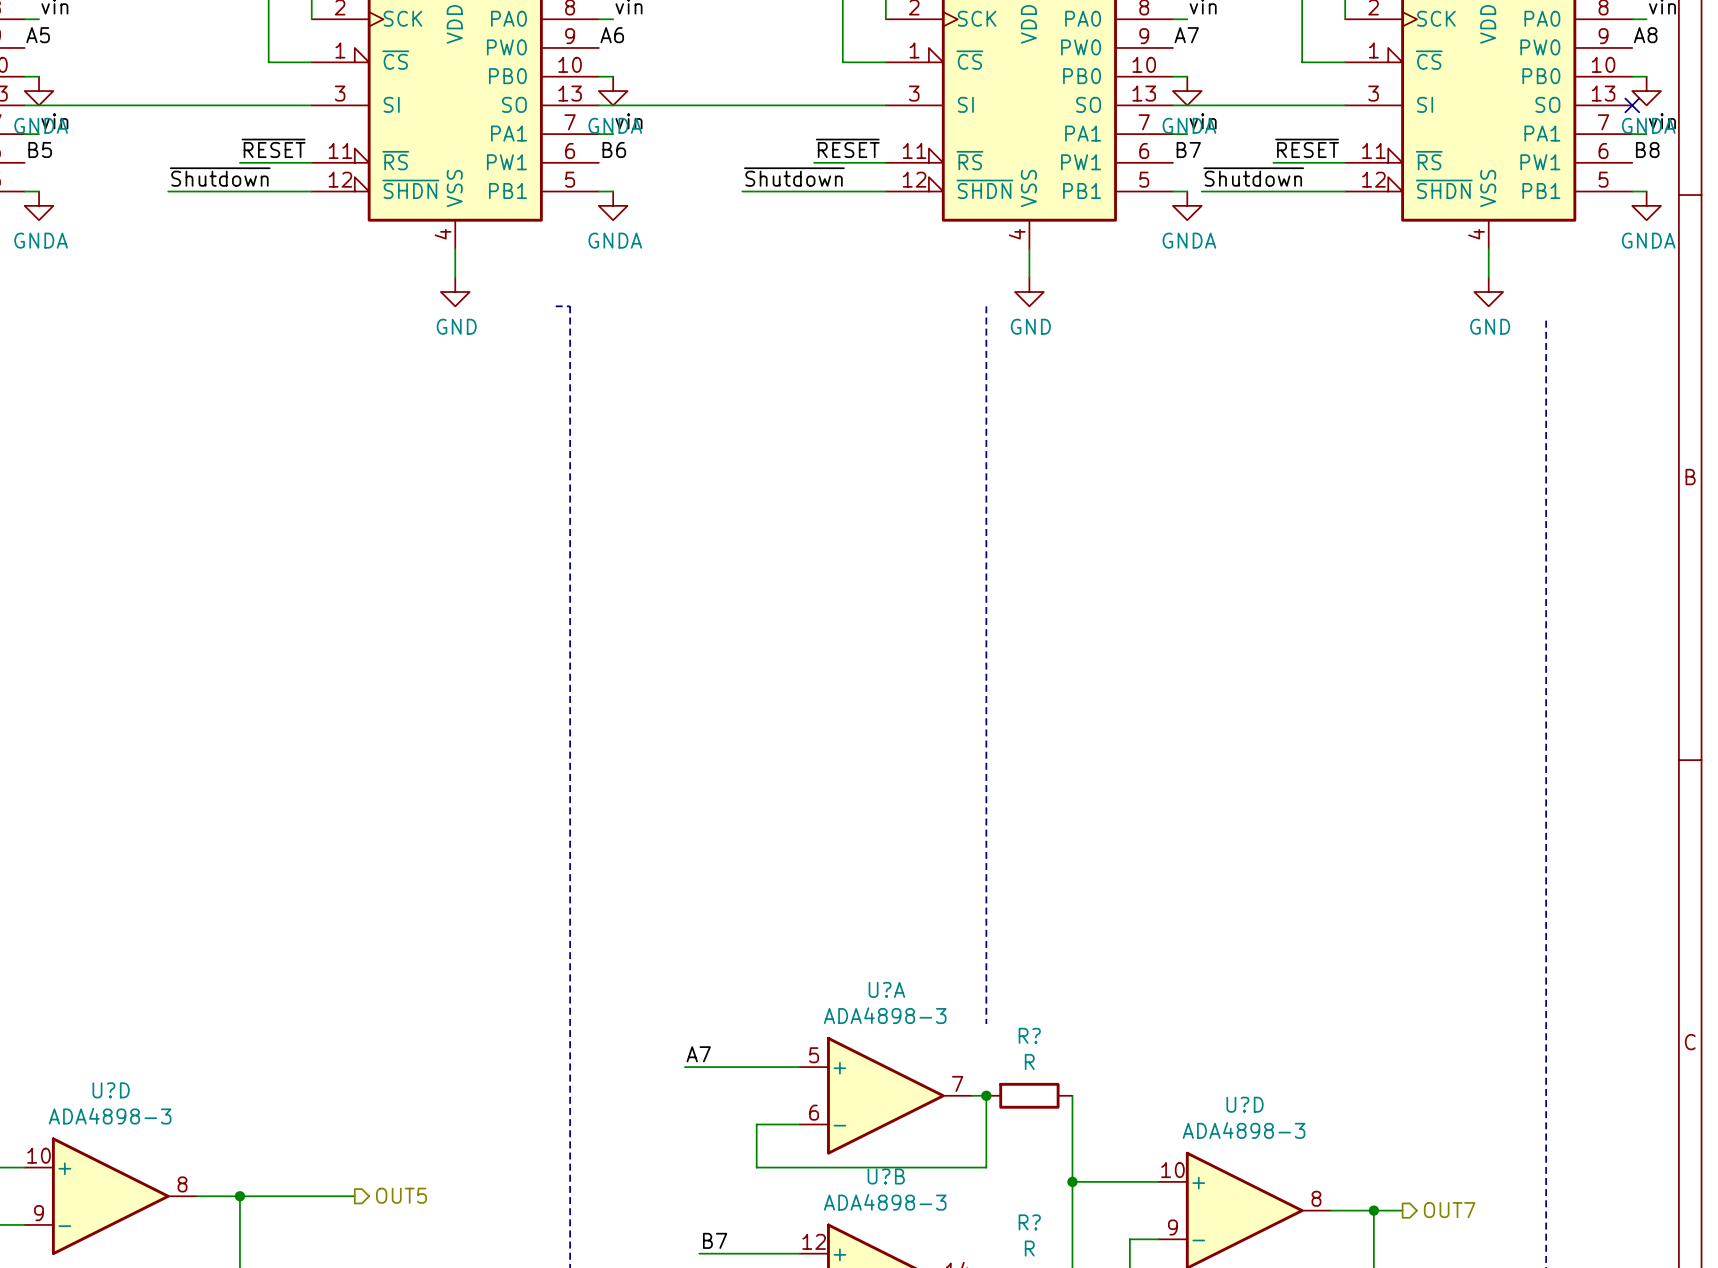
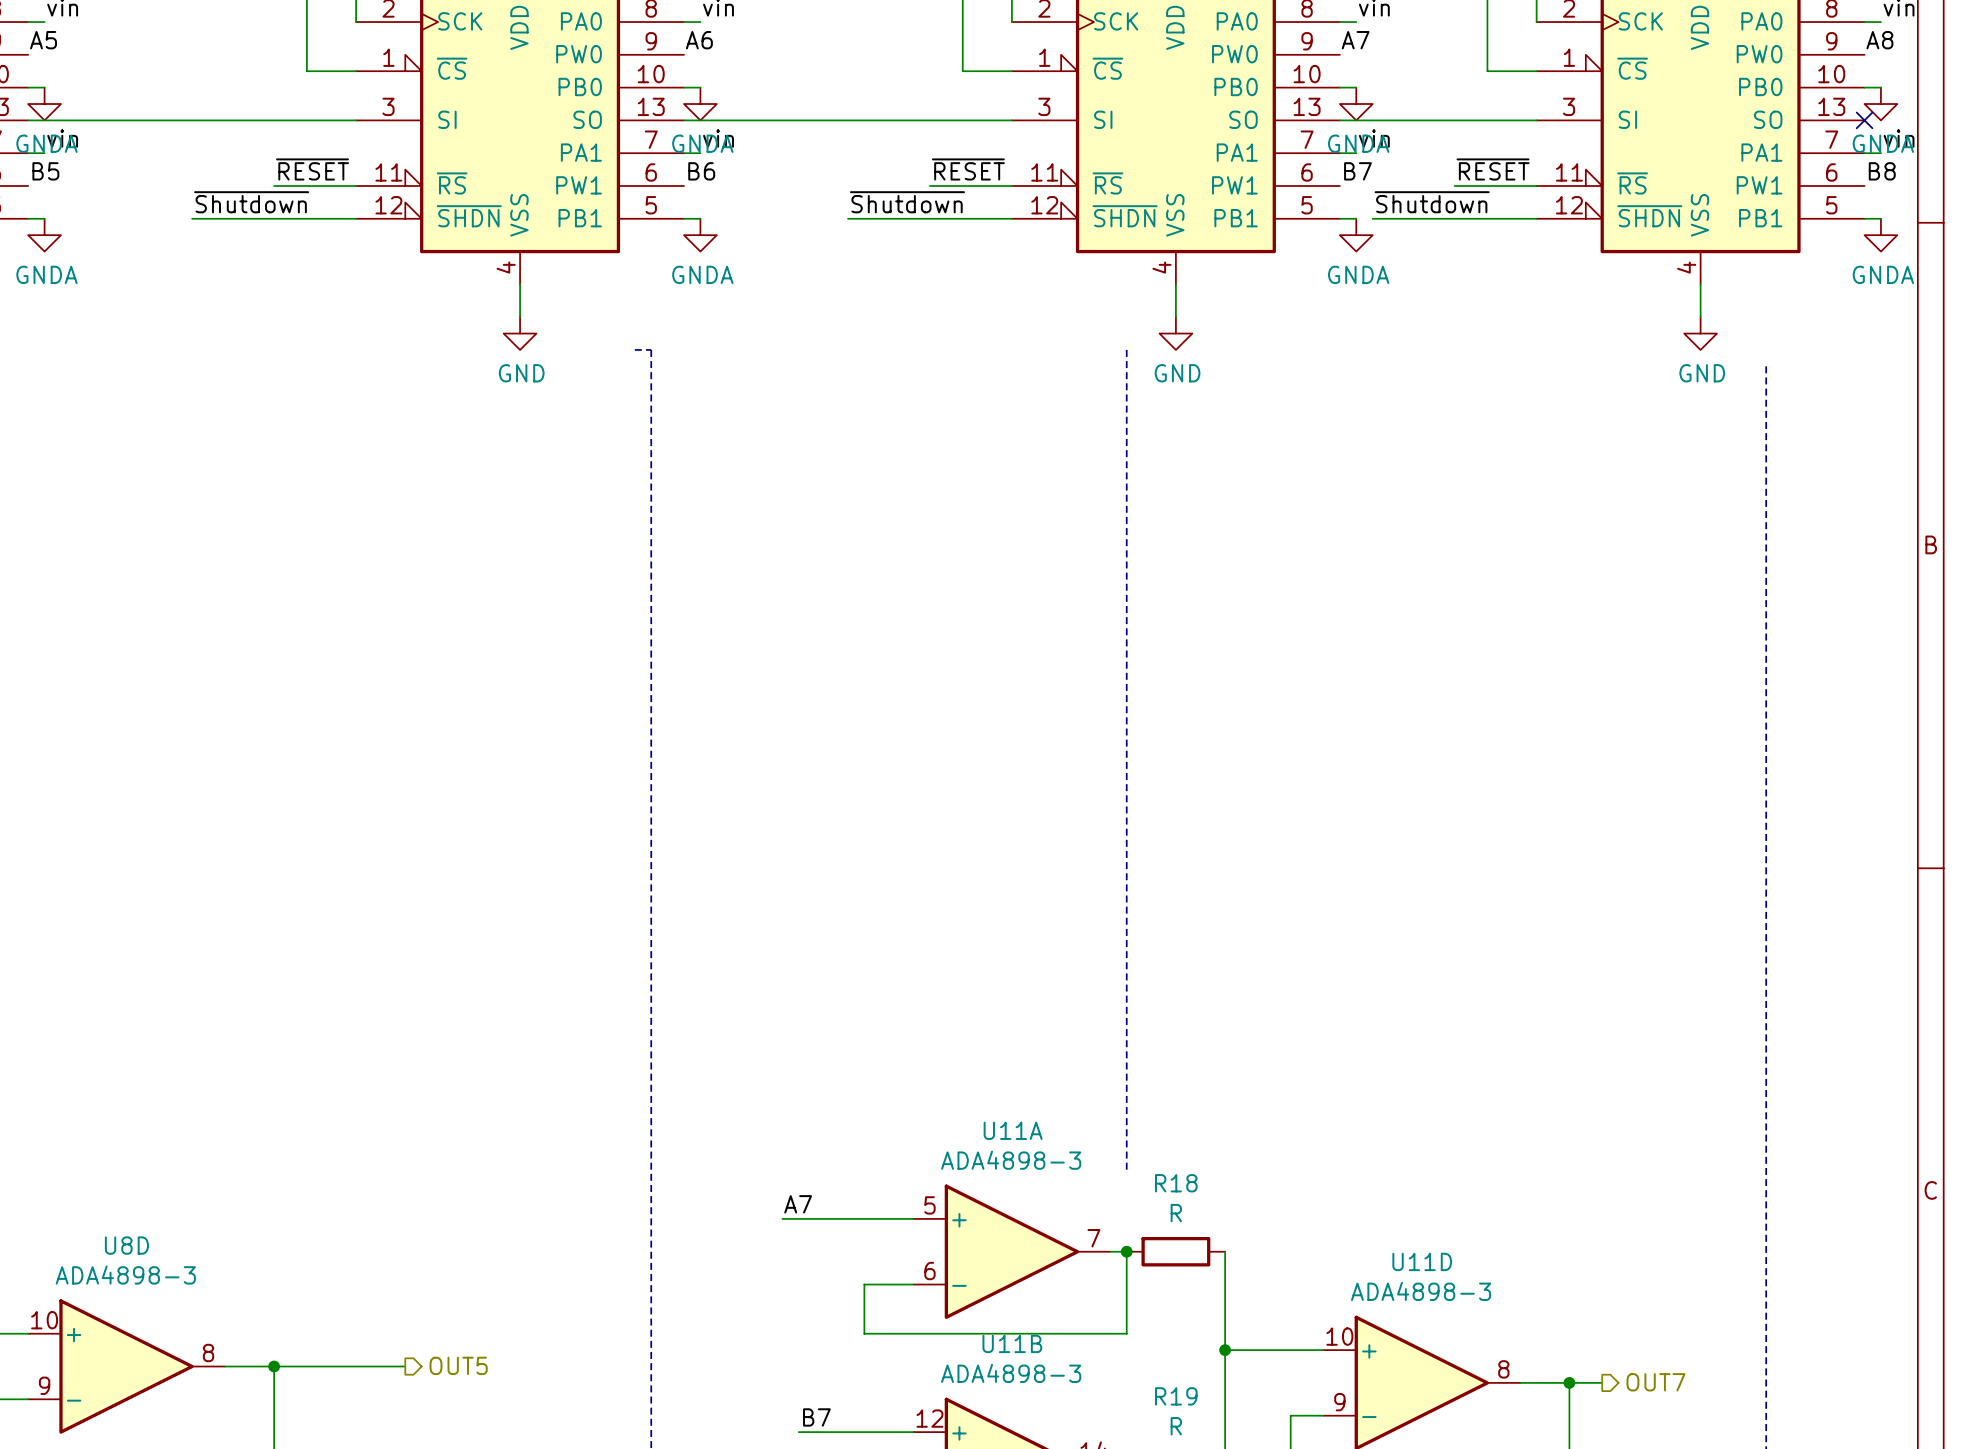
U?A name: U?A (886, 989) -> U11A (1013, 1130)
R? name: R? (1029, 1035) -> R18 (1176, 1183)
U?D name: U?D (111, 1090) -> U8D (126, 1245)
U?D name: U?D (1245, 1104) -> U11D (1422, 1261)
U?B name: U?B (886, 1176) -> U11B (1012, 1343)
R? name: R? (1029, 1222) -> R19 (1176, 1396)

